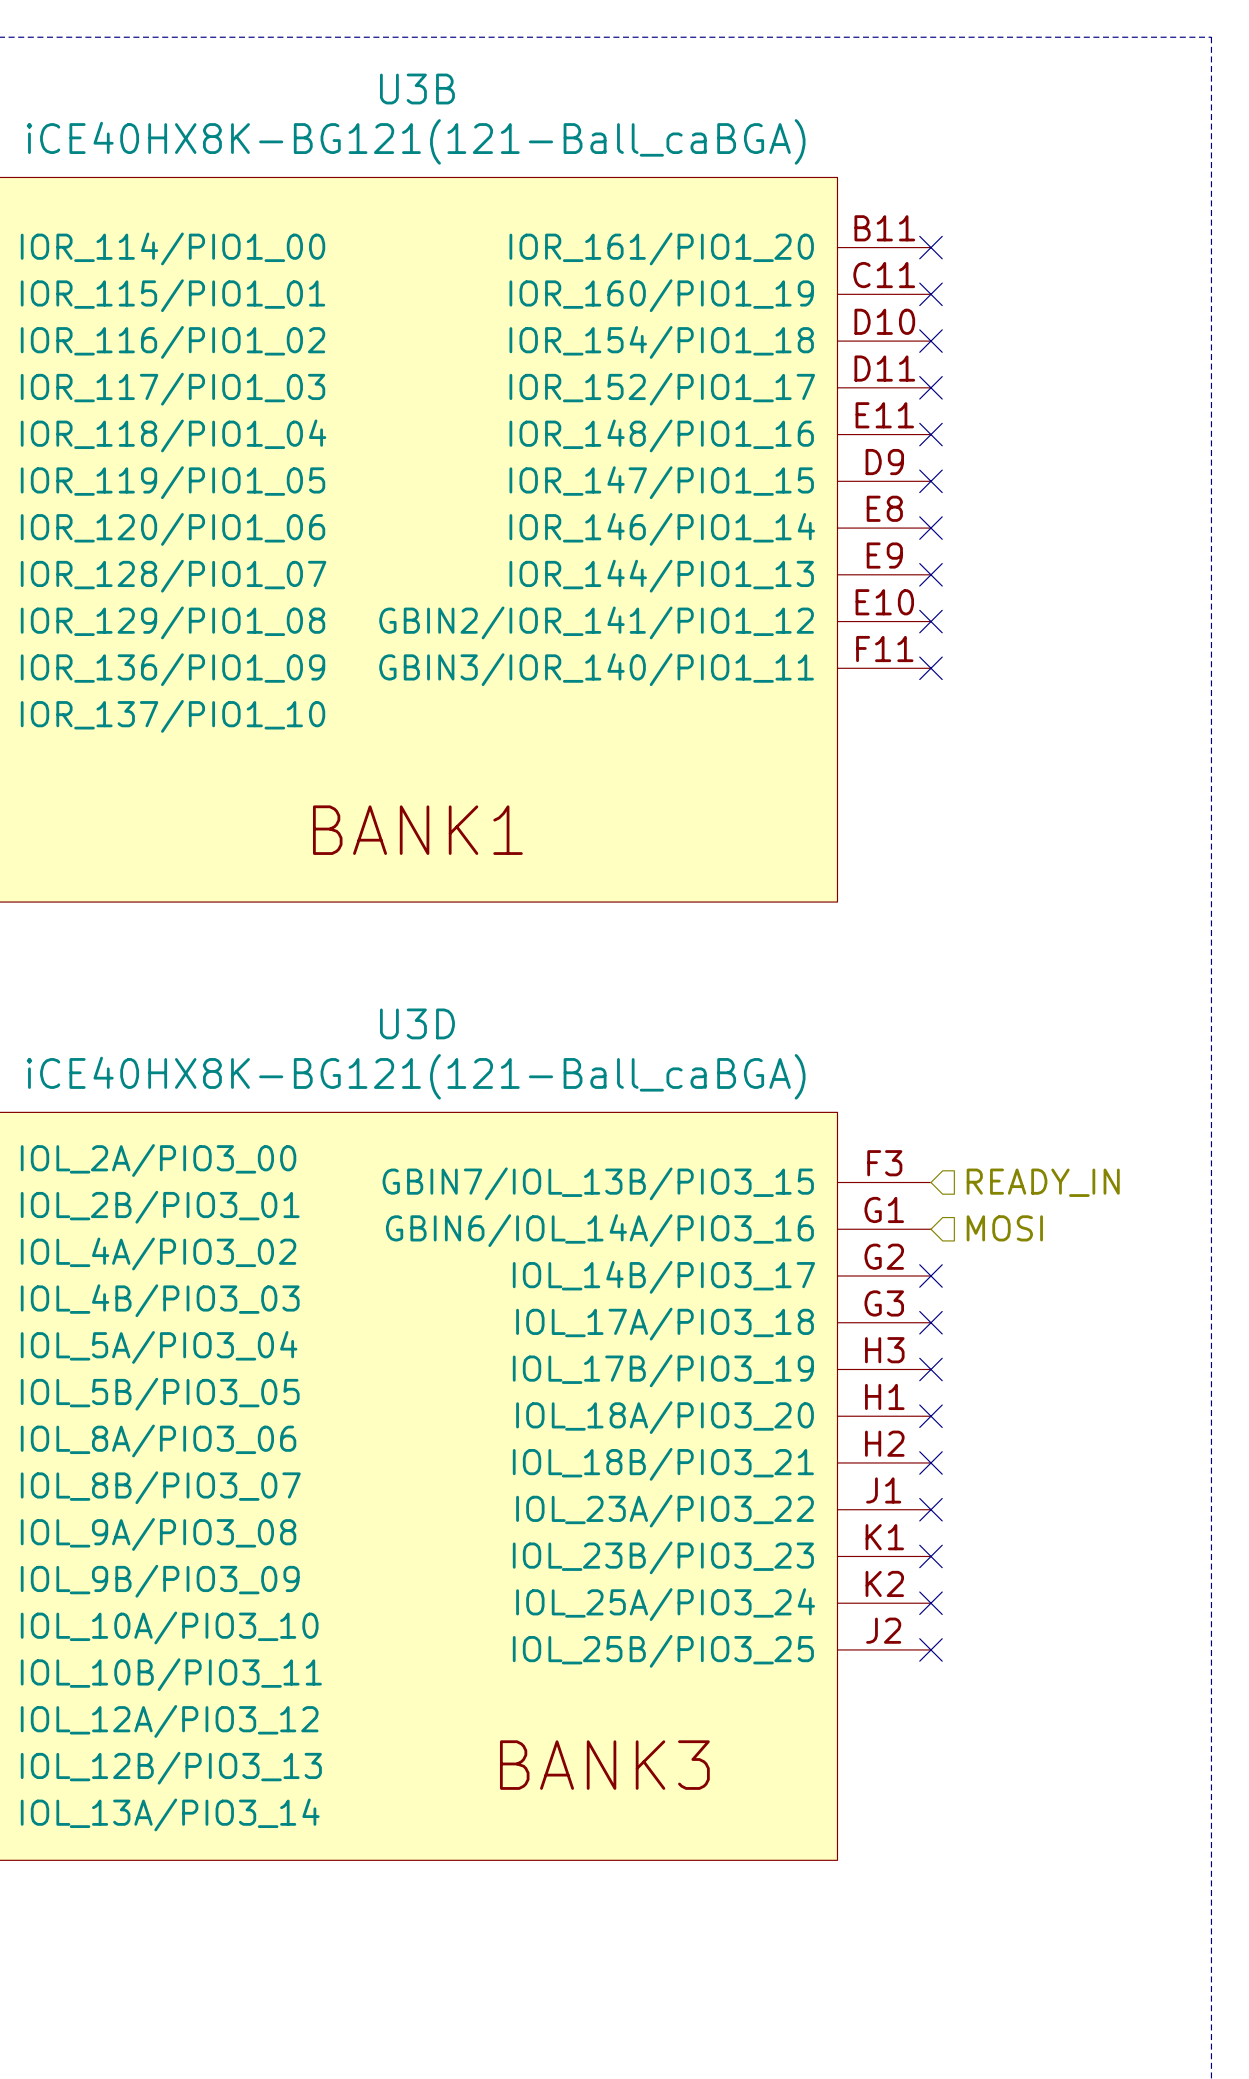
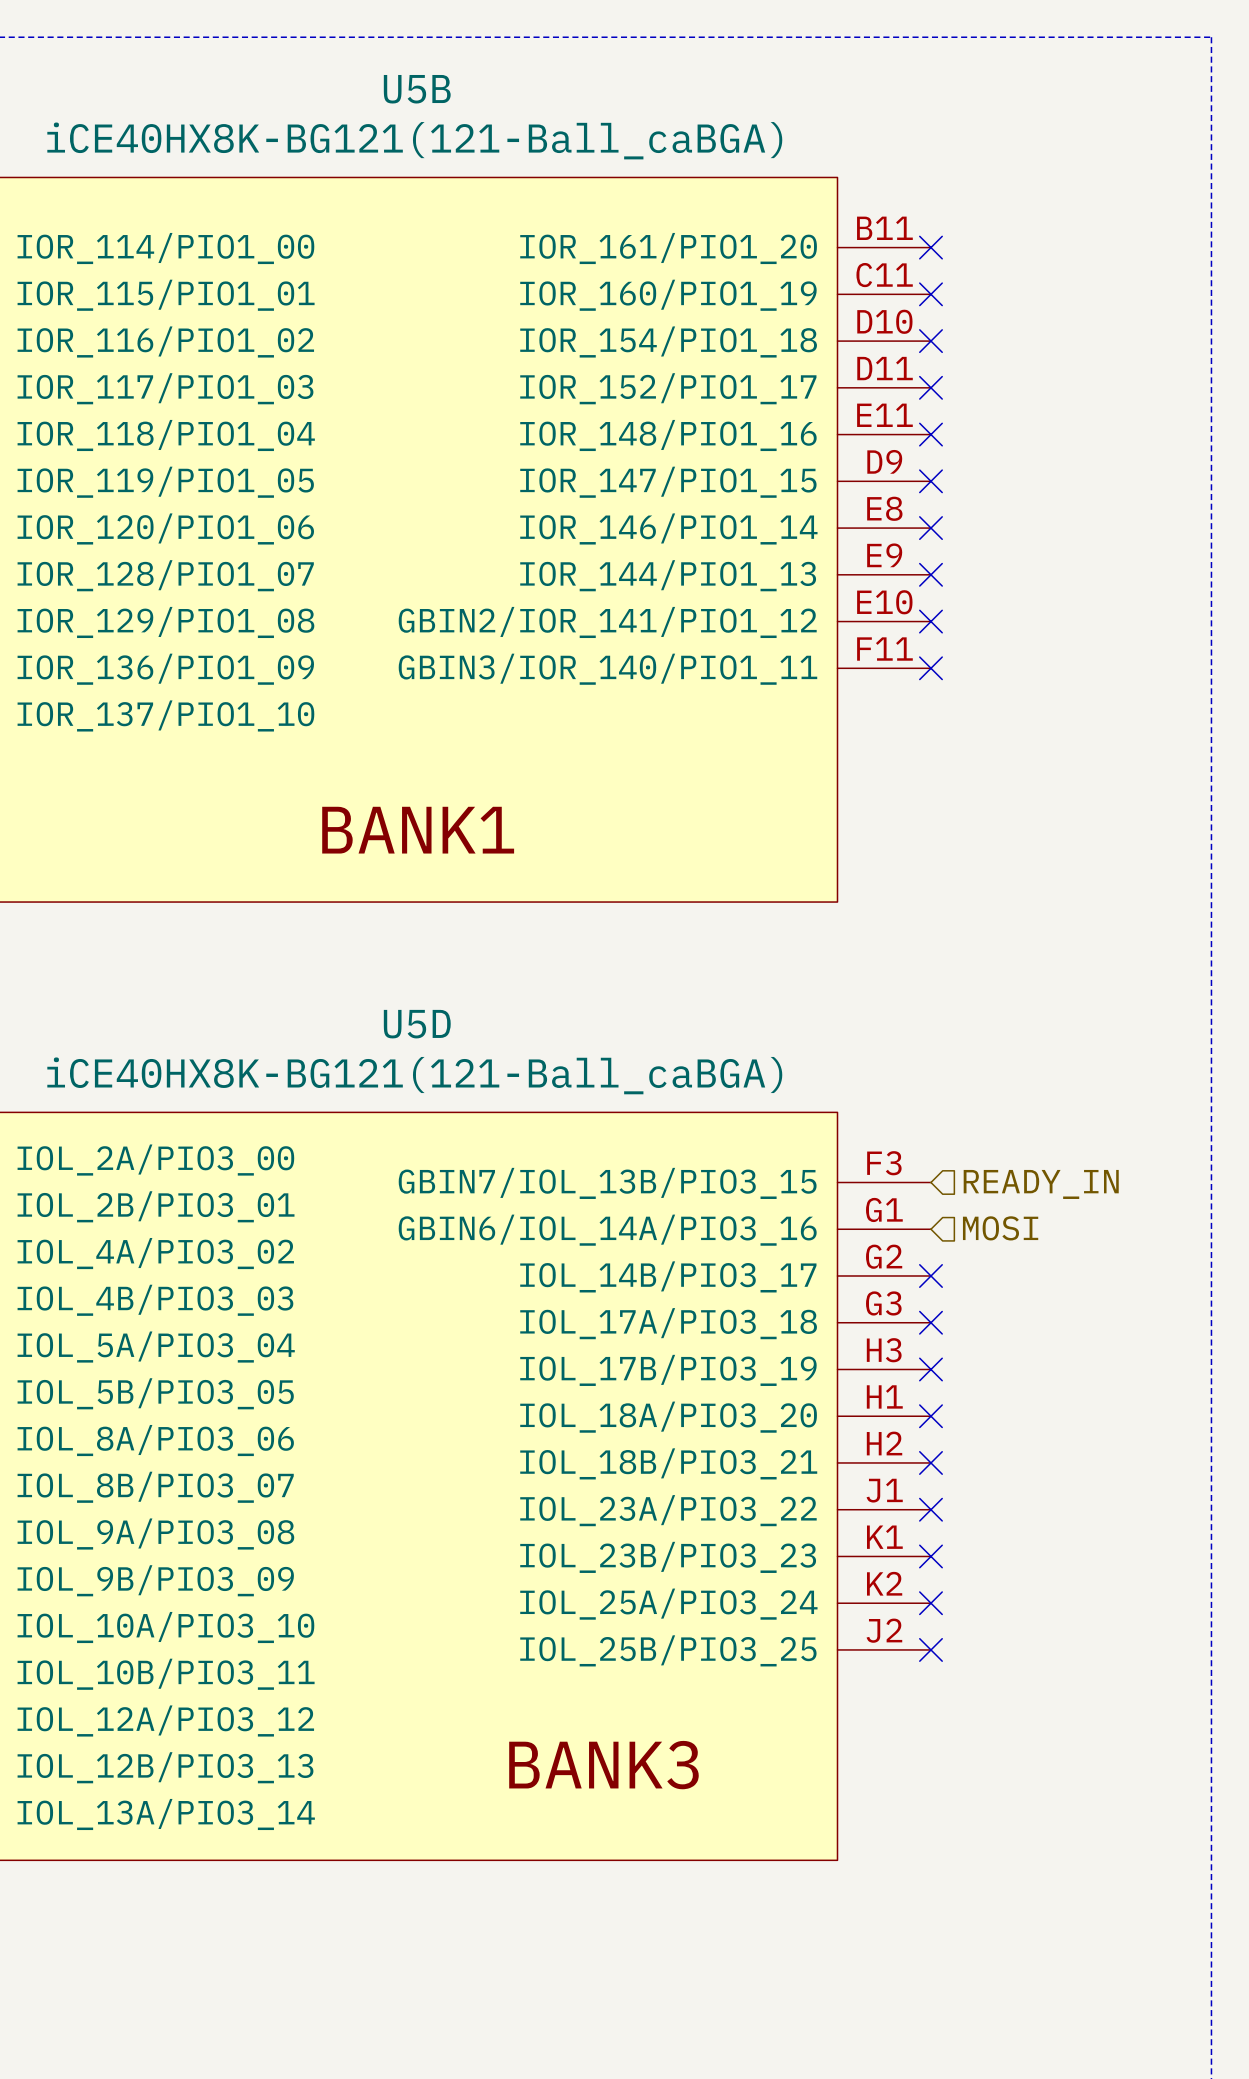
U3B name: U3B (417, 89) -> U5B (417, 89)
U3D name: U3D (417, 1023) -> U5D (417, 1024)

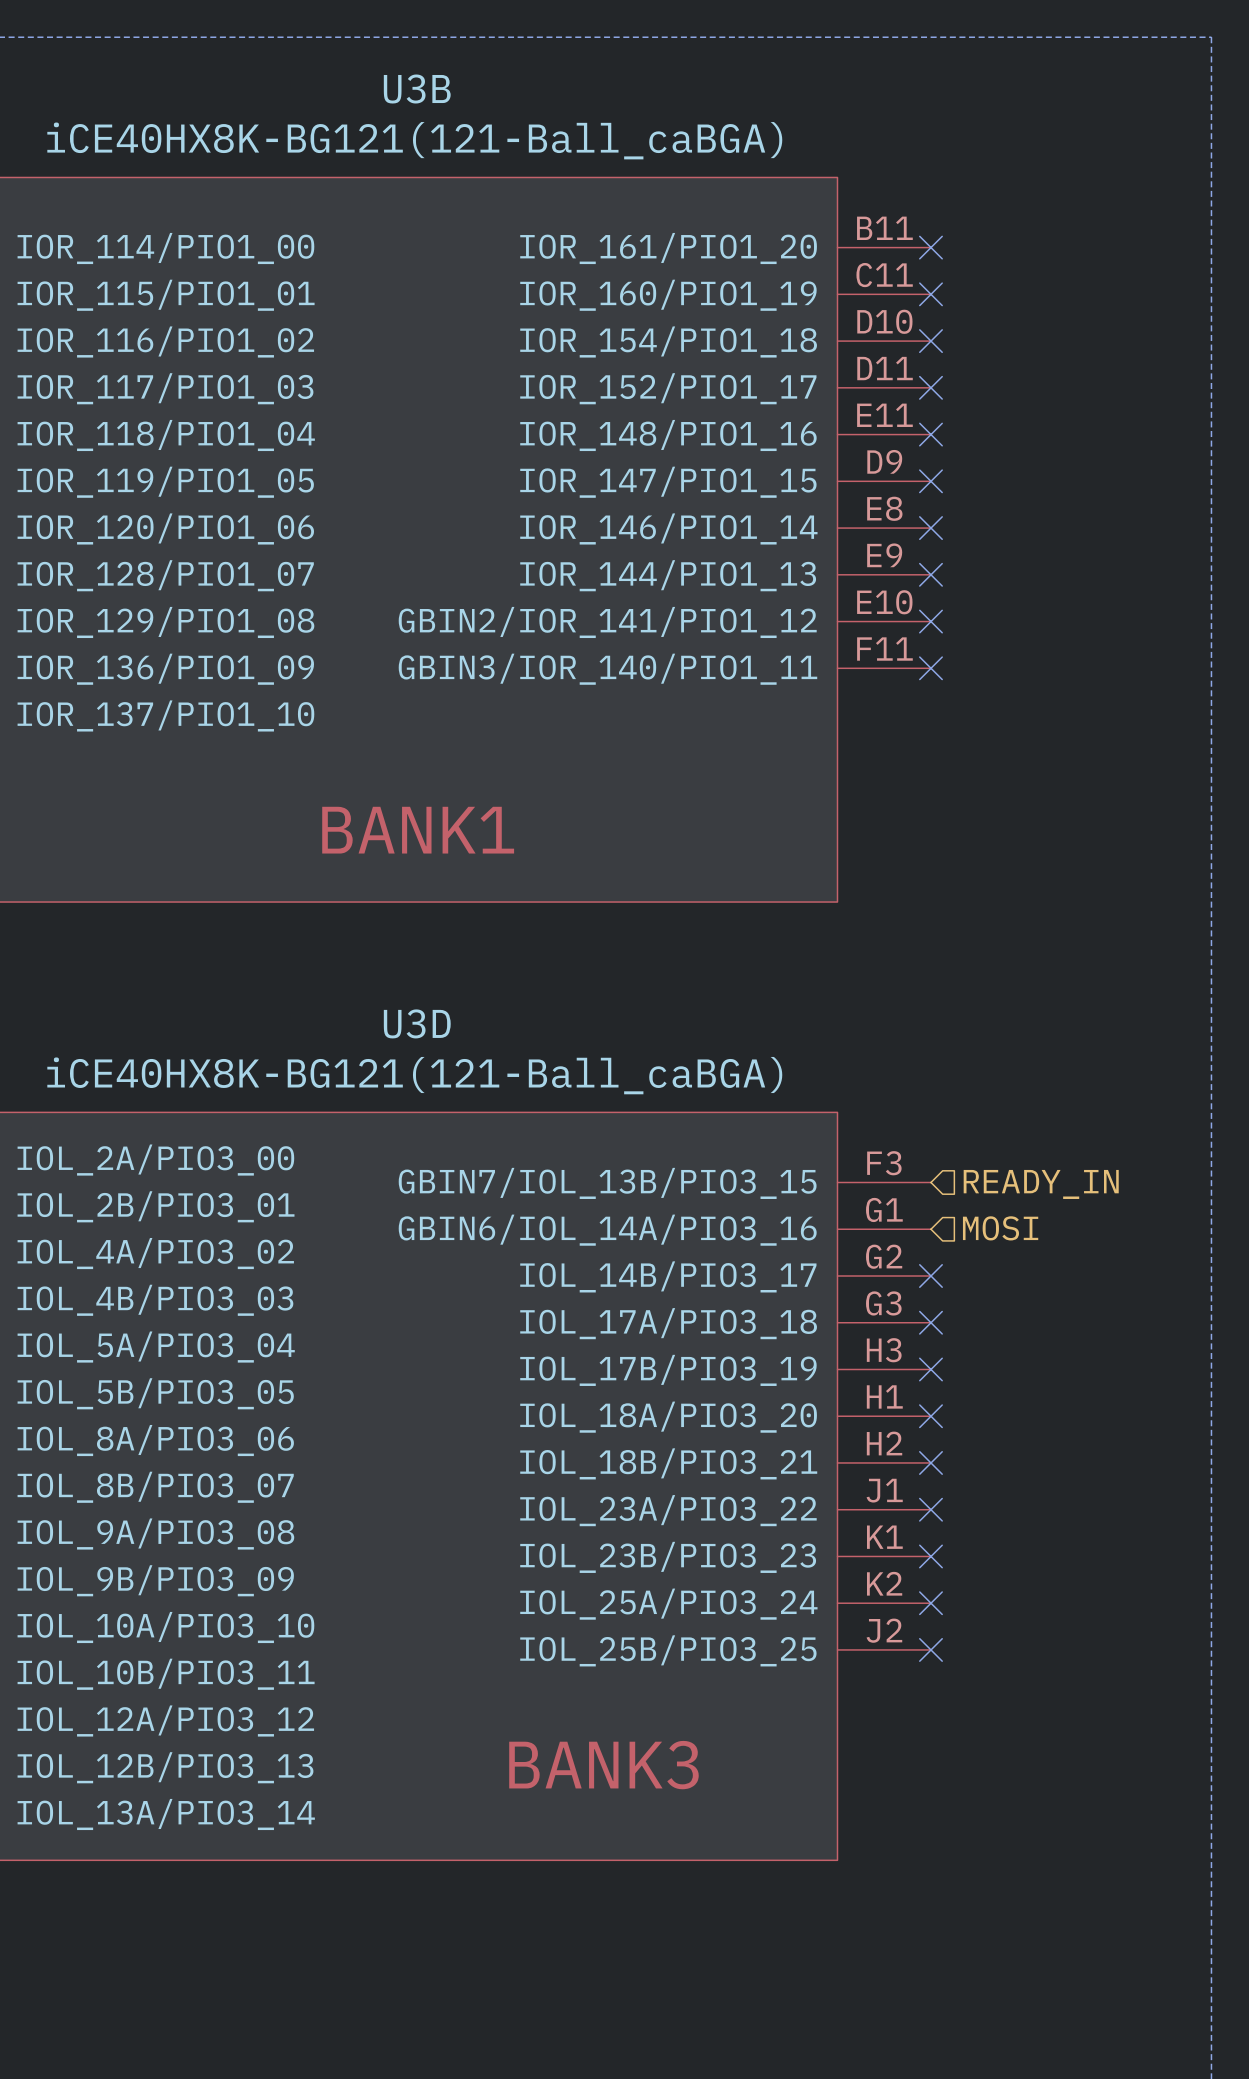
U5B name: U5B (417, 89) -> U3B (417, 89)
U5D name: U5D (417, 1024) -> U3D (417, 1023)

